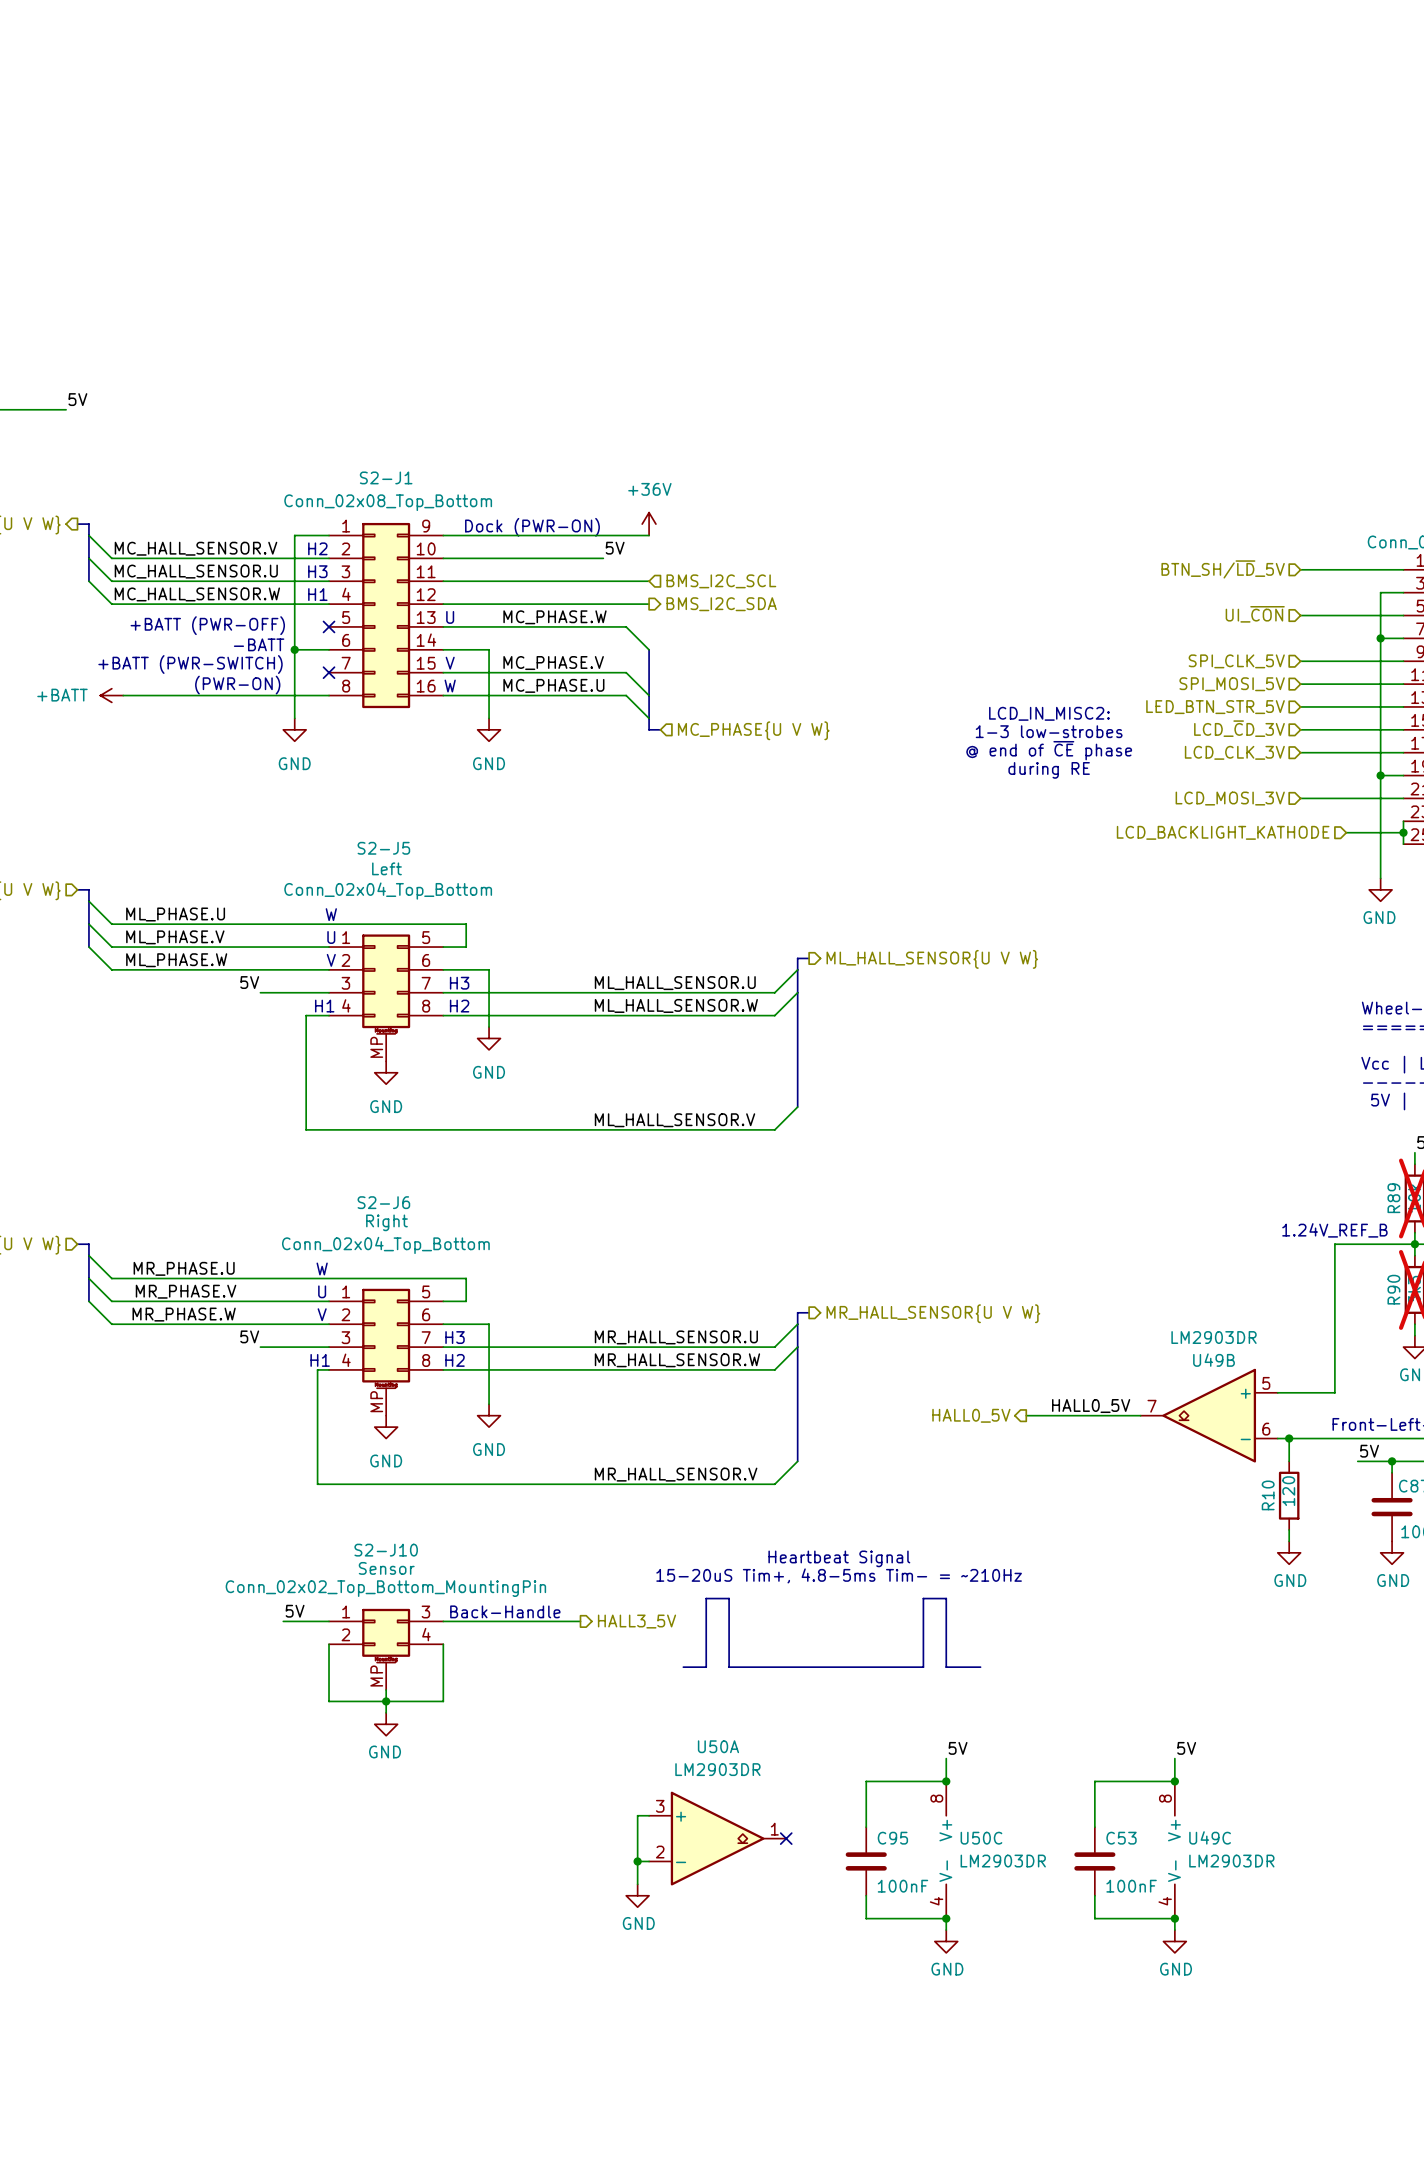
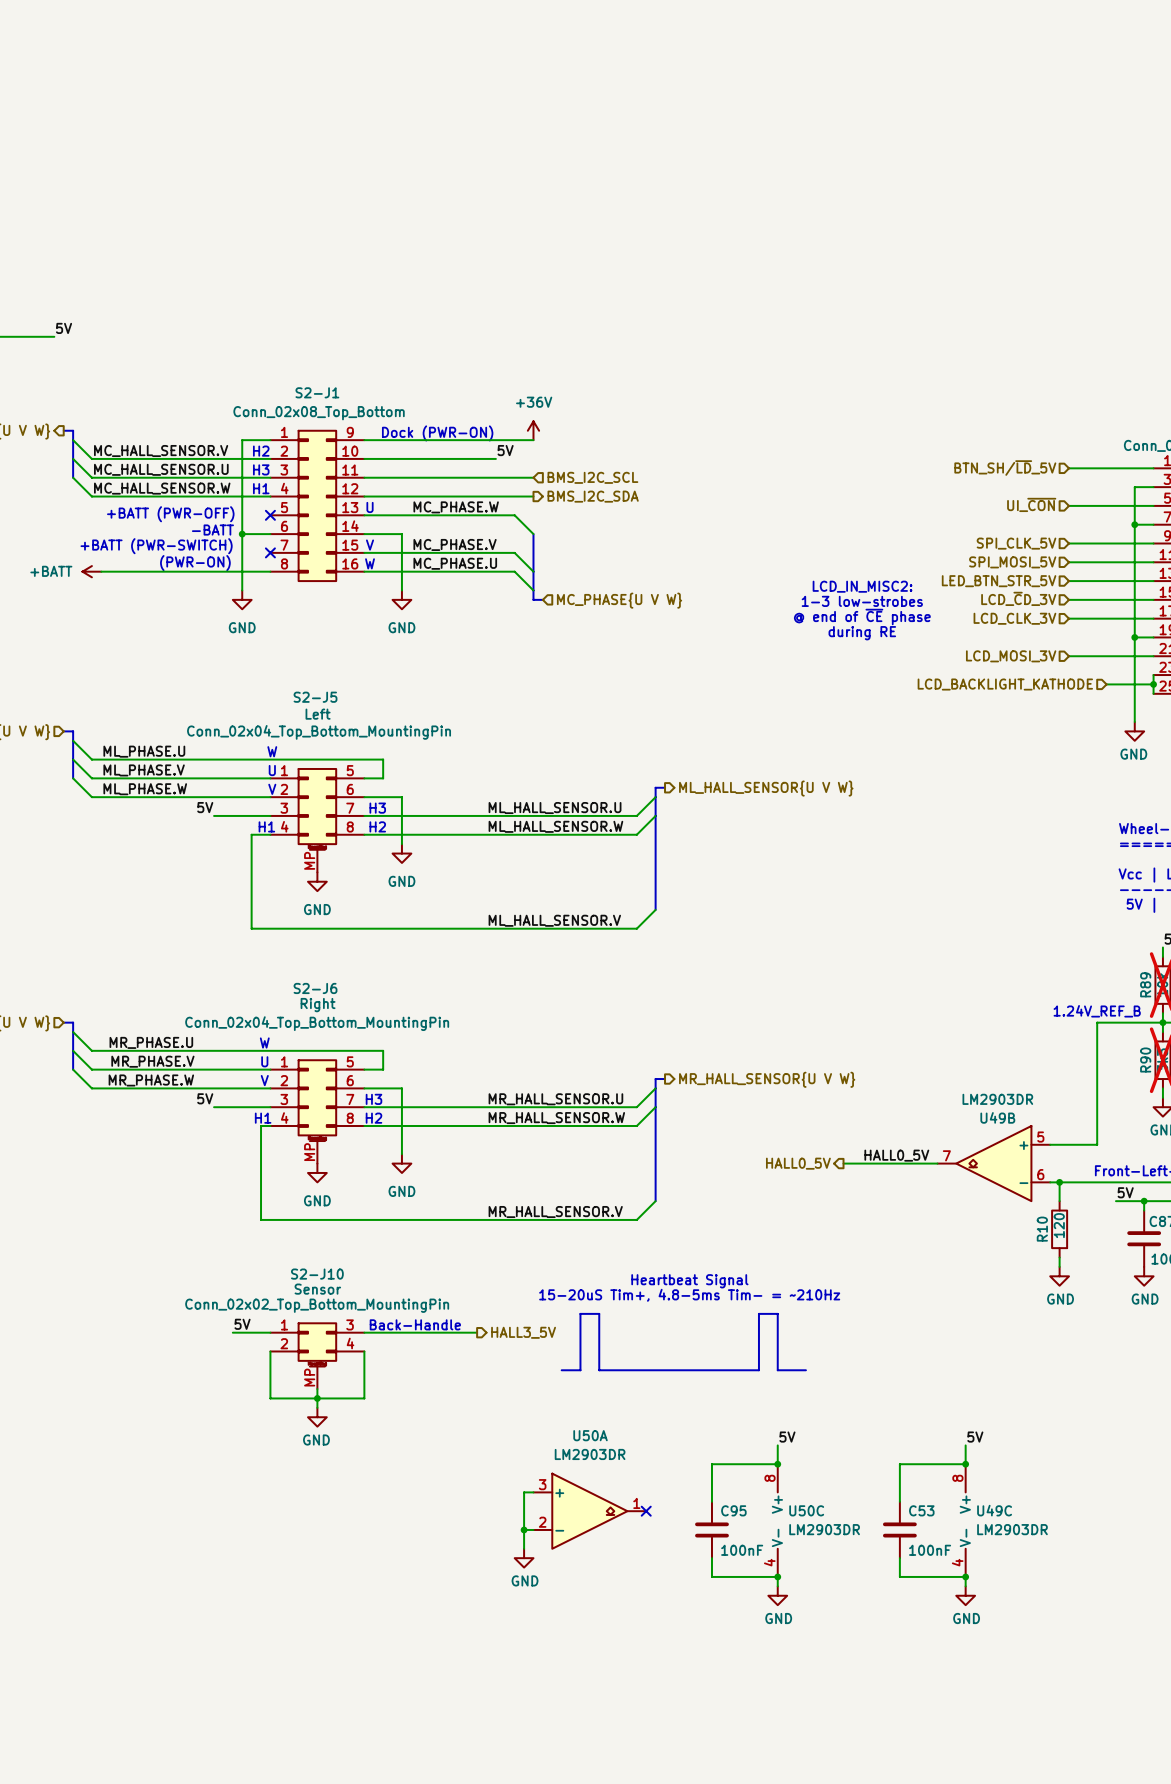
S2-J5 value: Conn_02x04_Top_Bottom (388, 891) -> Conn_02x04_Top_Bottom_MountingPin (319, 732)
S2-J6 value: Conn_02x04_Top_Bottom (385, 1245) -> Conn_02x04_Top_Bottom_MountingPin (317, 1023)

